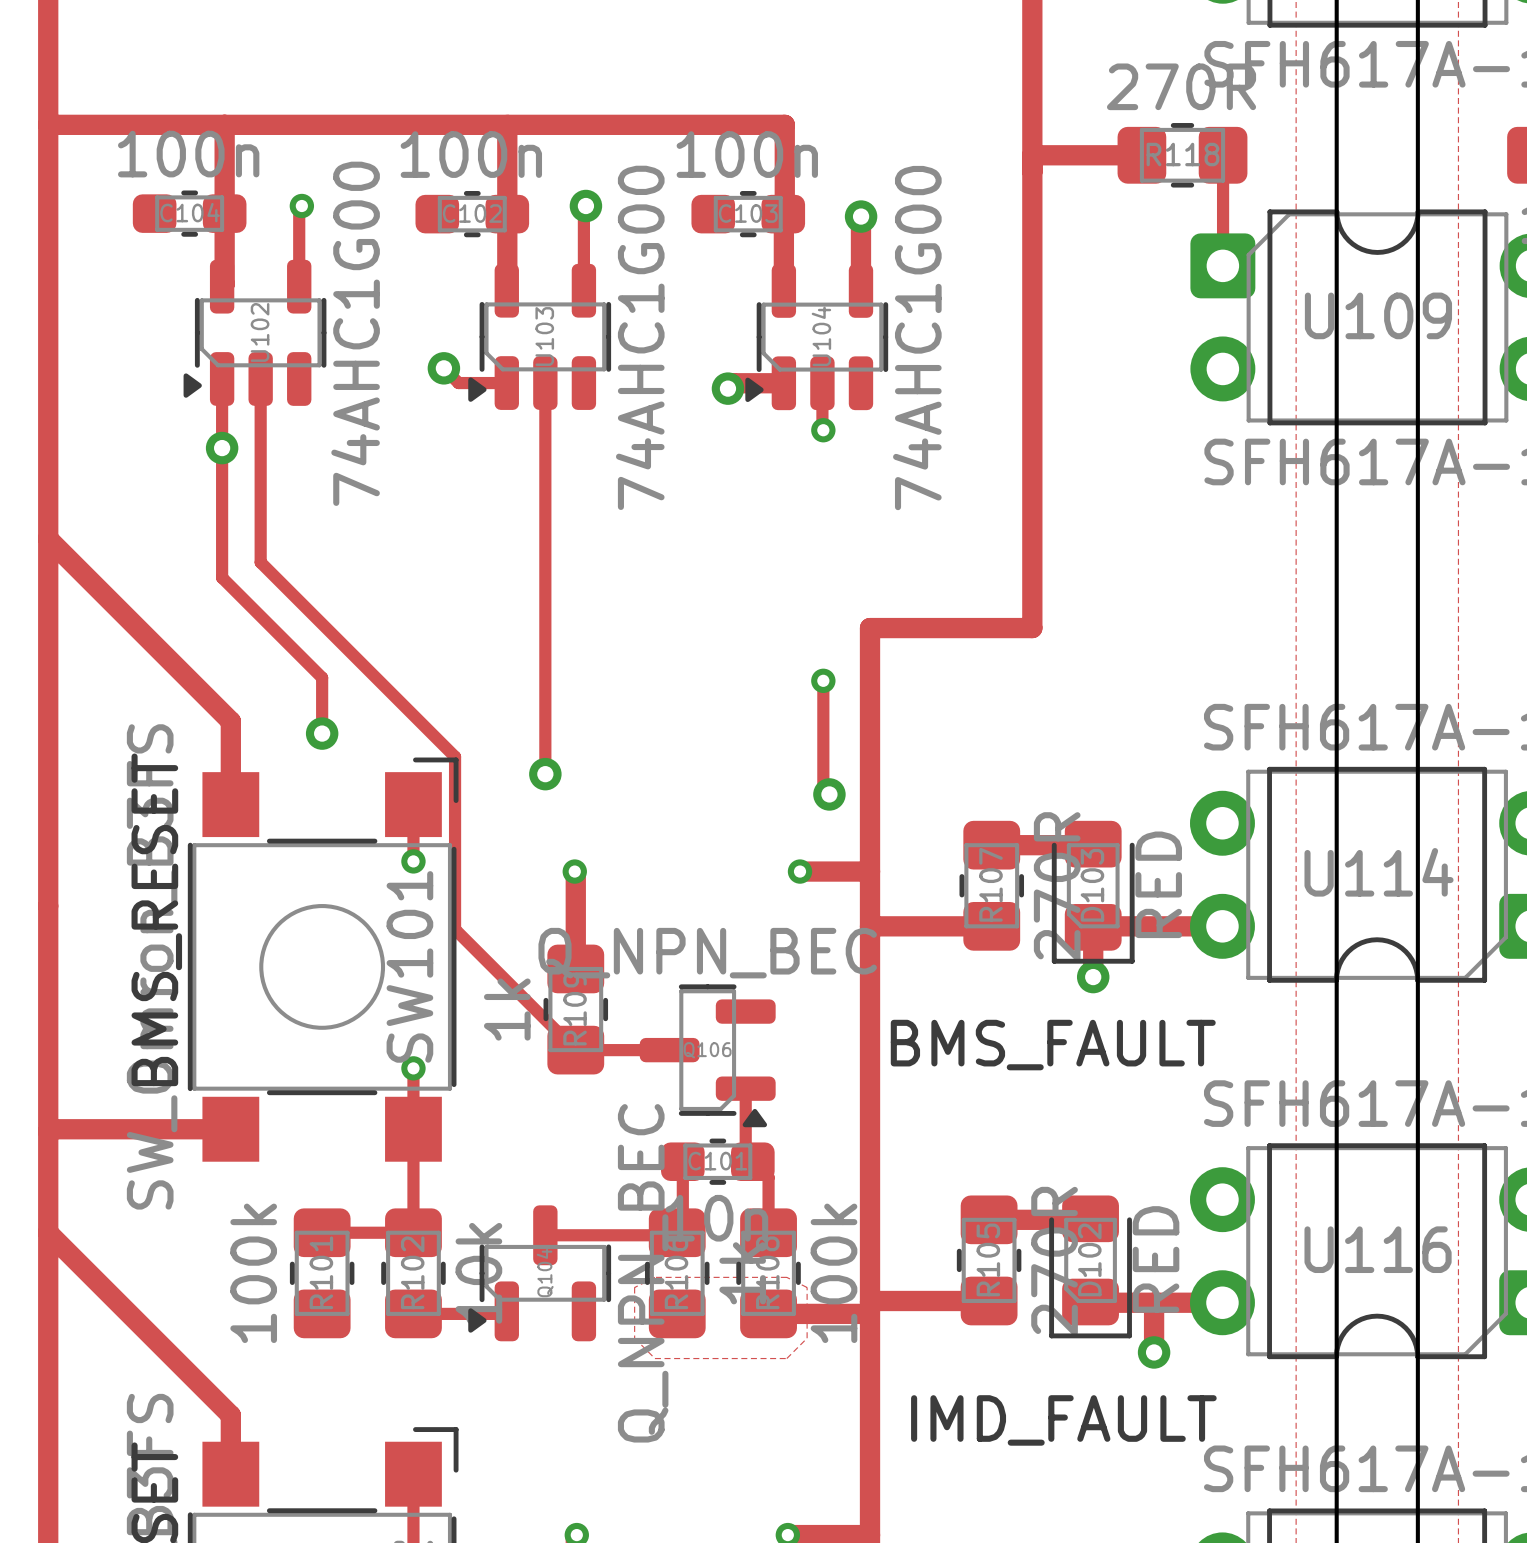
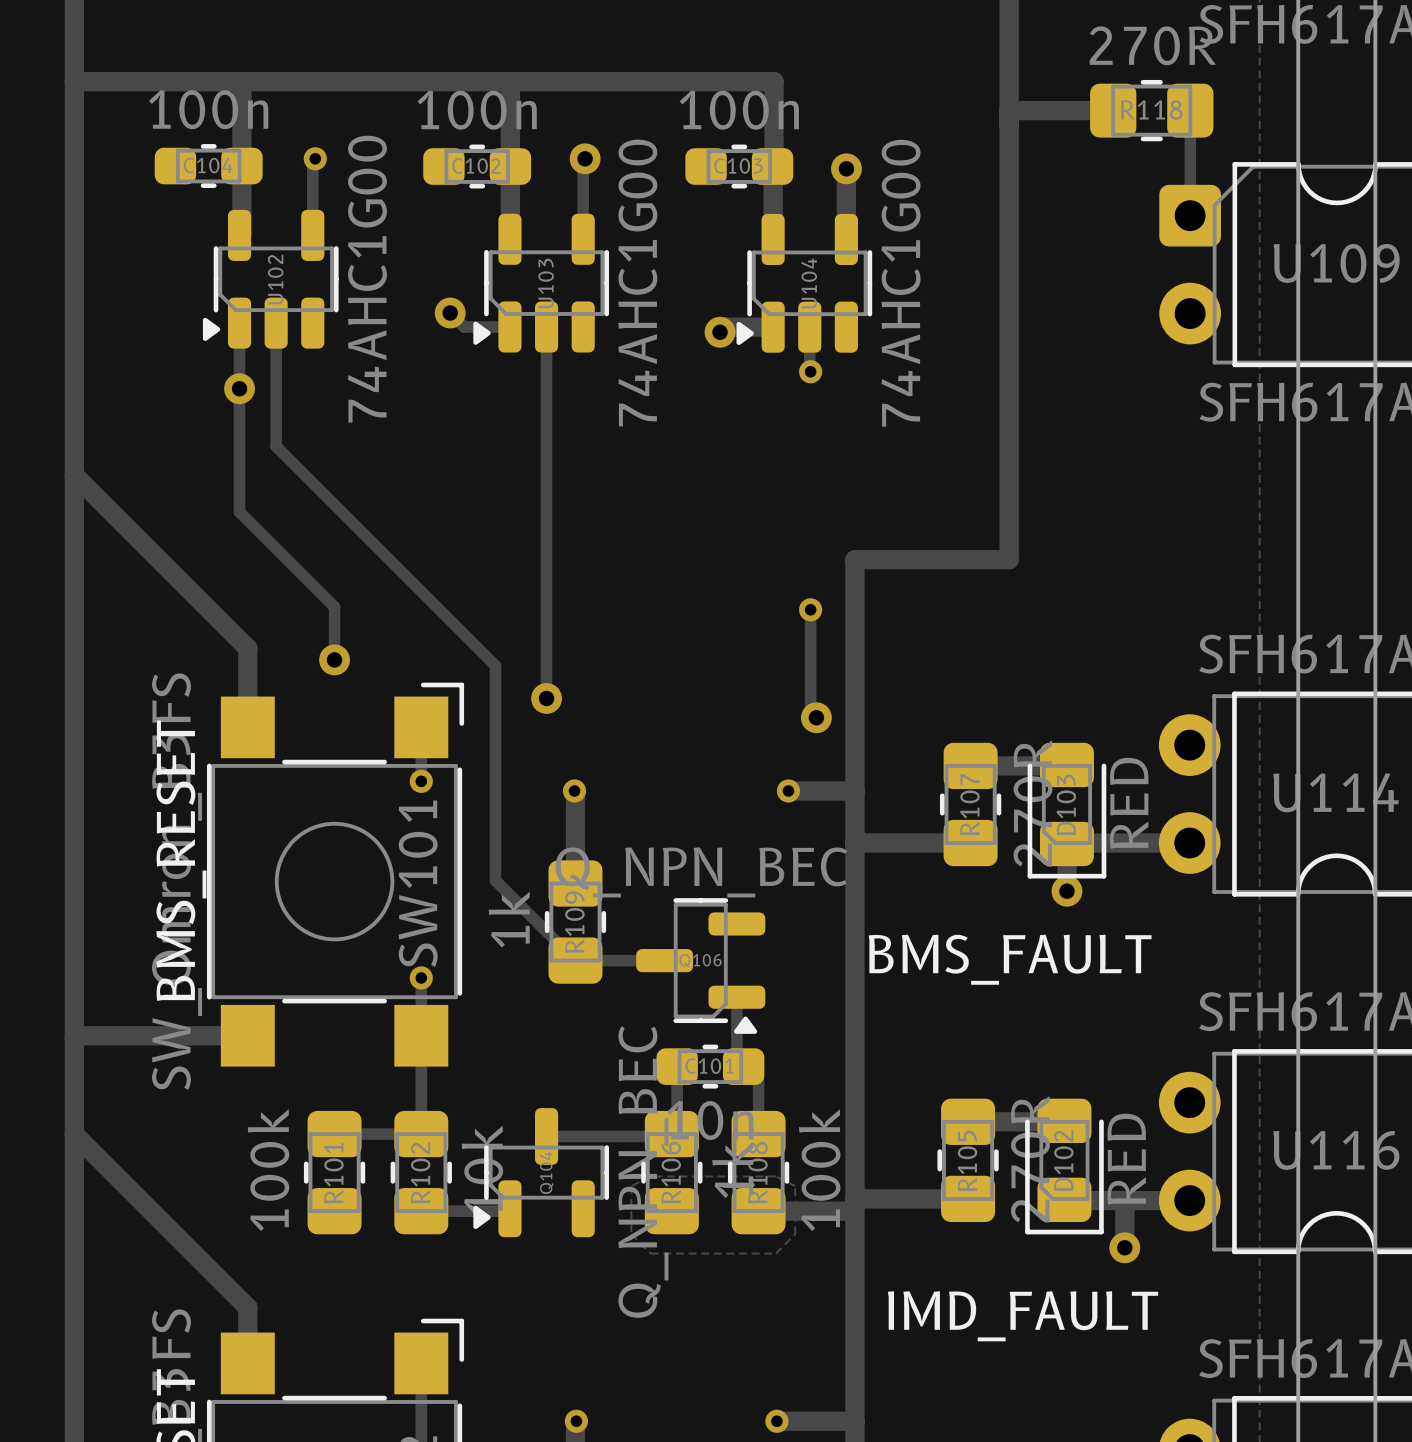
track: (260, 508) (260, 562) (455, 756) (455, 929) (491, 965) -> (276, 446) (495, 665) (495, 880)

